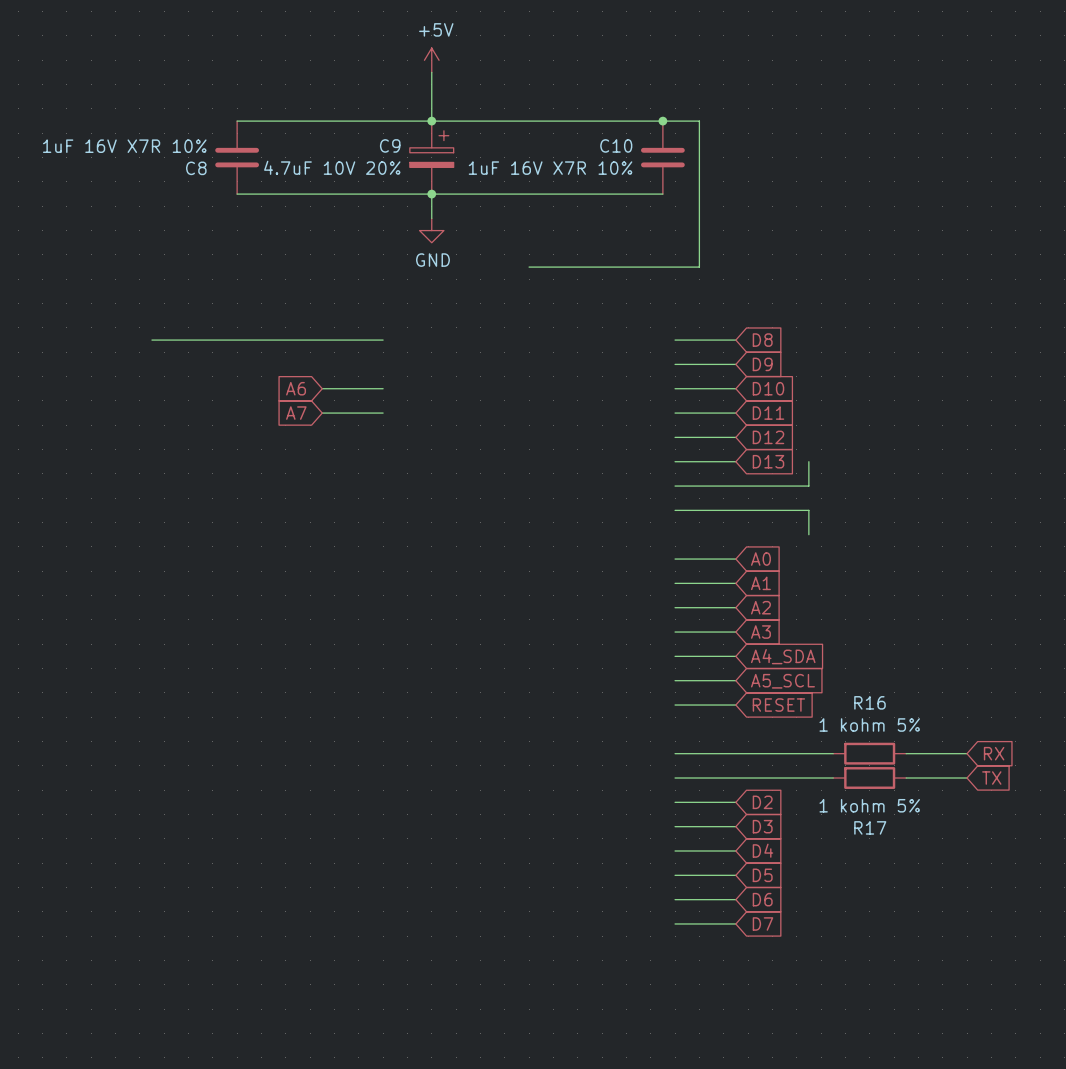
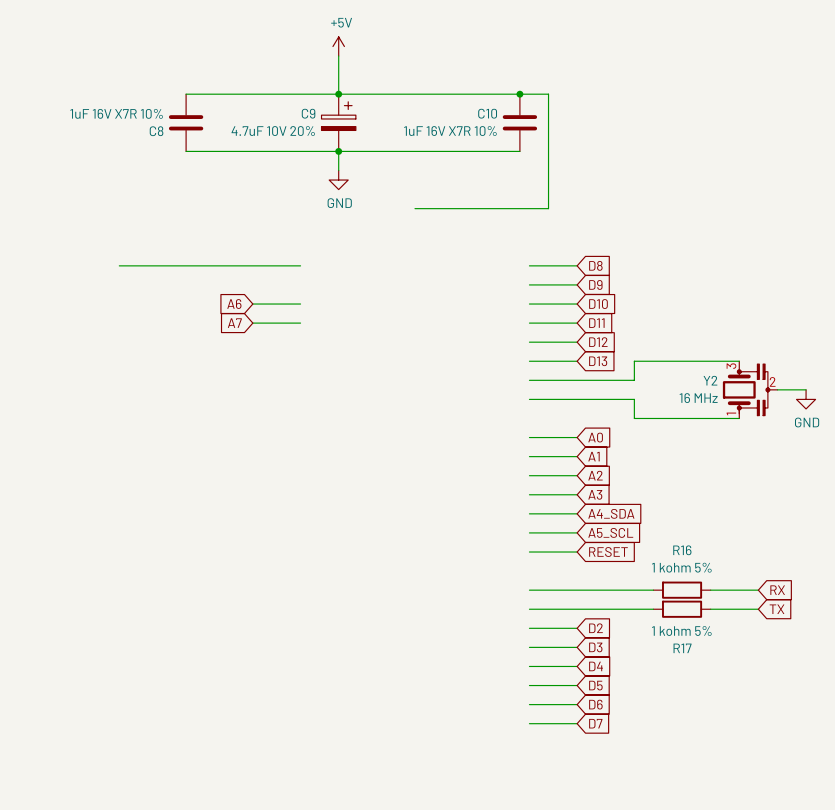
wire: none -> (634, 361) (739, 361)
Y2: none -> 16 MHz (750, 389)
wire: none -> (777, 389) (806, 389)
power symbol: none -> GND (806, 399)
wire: none -> (634, 418) (739, 418)

